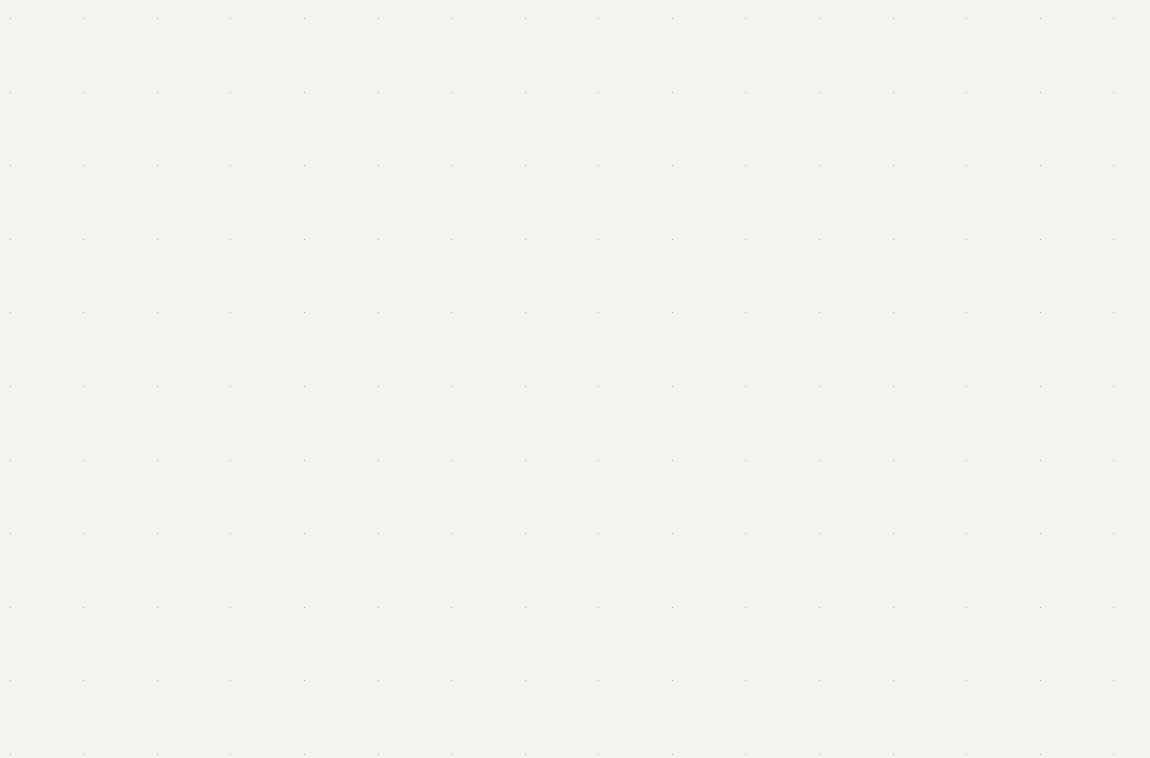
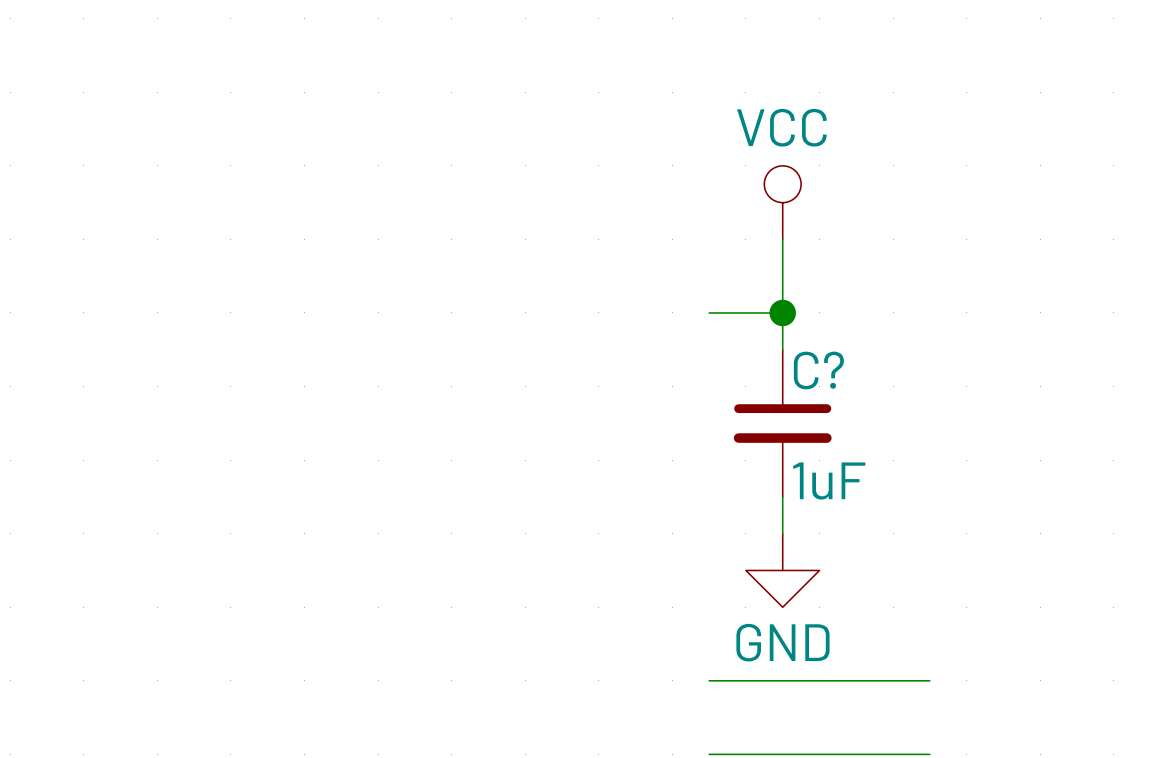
power symbol: none -> VCC (782, 202)
wire: none -> (782, 239) (782, 349)
wire: none -> (709, 312) (782, 312)
junction: none -> (782, 312)
C?: none -> 1uF (782, 423)
wire: none -> (782, 496) (782, 533)
power symbol: none -> GND (782, 570)
wire: none -> (709, 680) (929, 680)
wire: none -> (709, 754) (929, 754)

